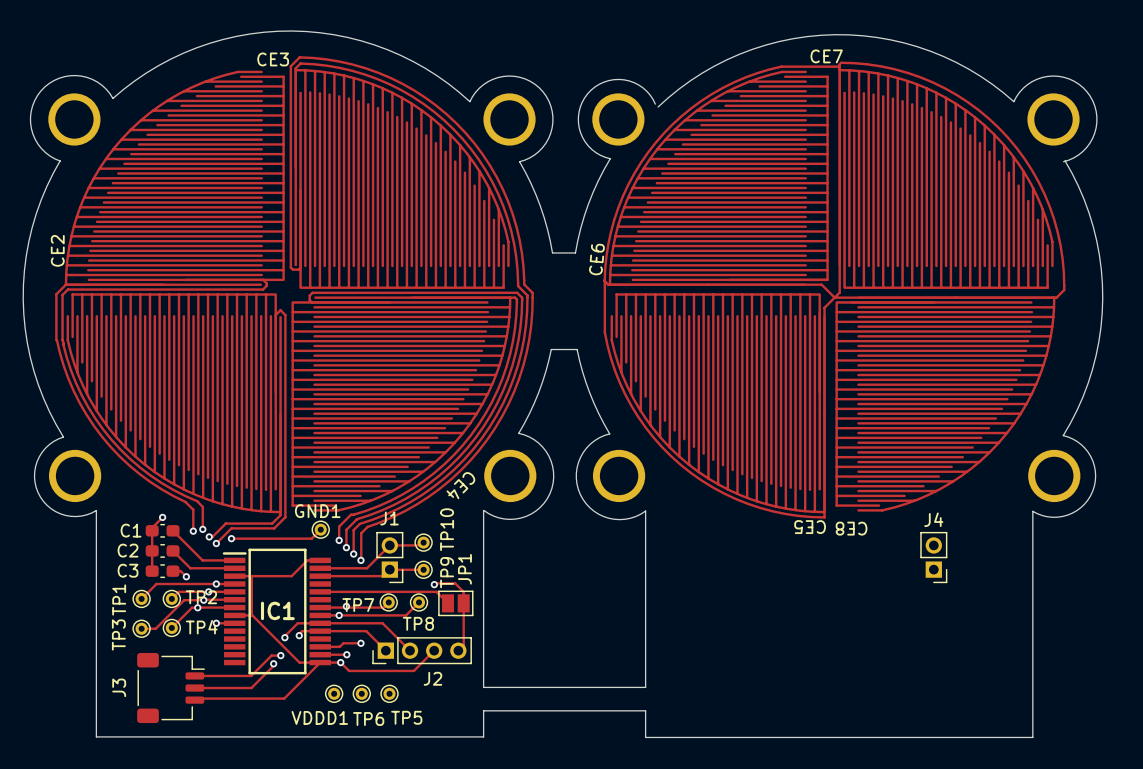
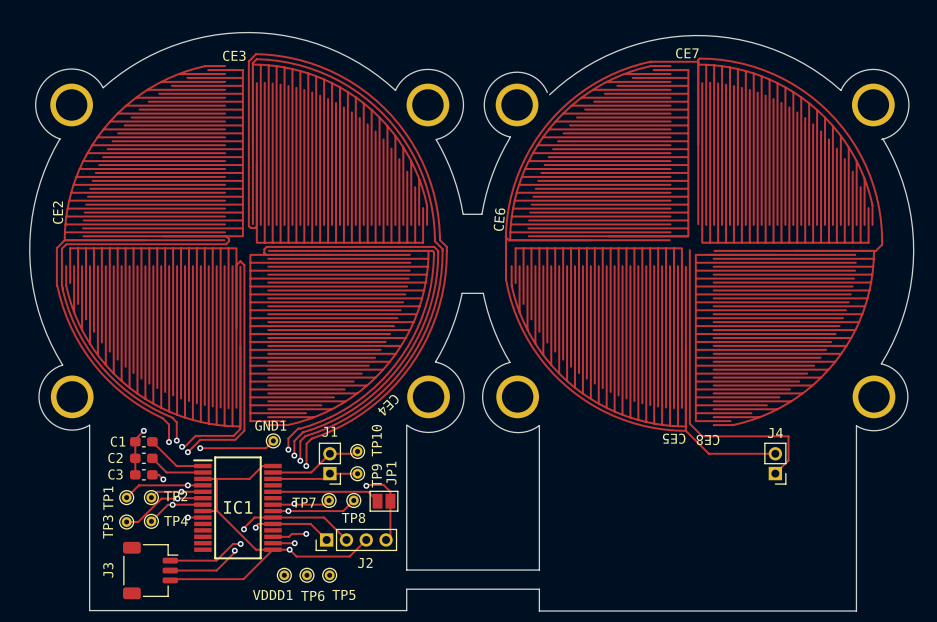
track: (839, 168) (839, 292) (824, 307) (824, 414) -> none
track: (707, 284) (821, 284) (834, 297) (956, 297) -> none
track: none -> (689, 250) (689, 423) (702, 436) (788, 436) (788, 460) (775, 473)
track: none -> (685, 430) (708, 453) (775, 453)

